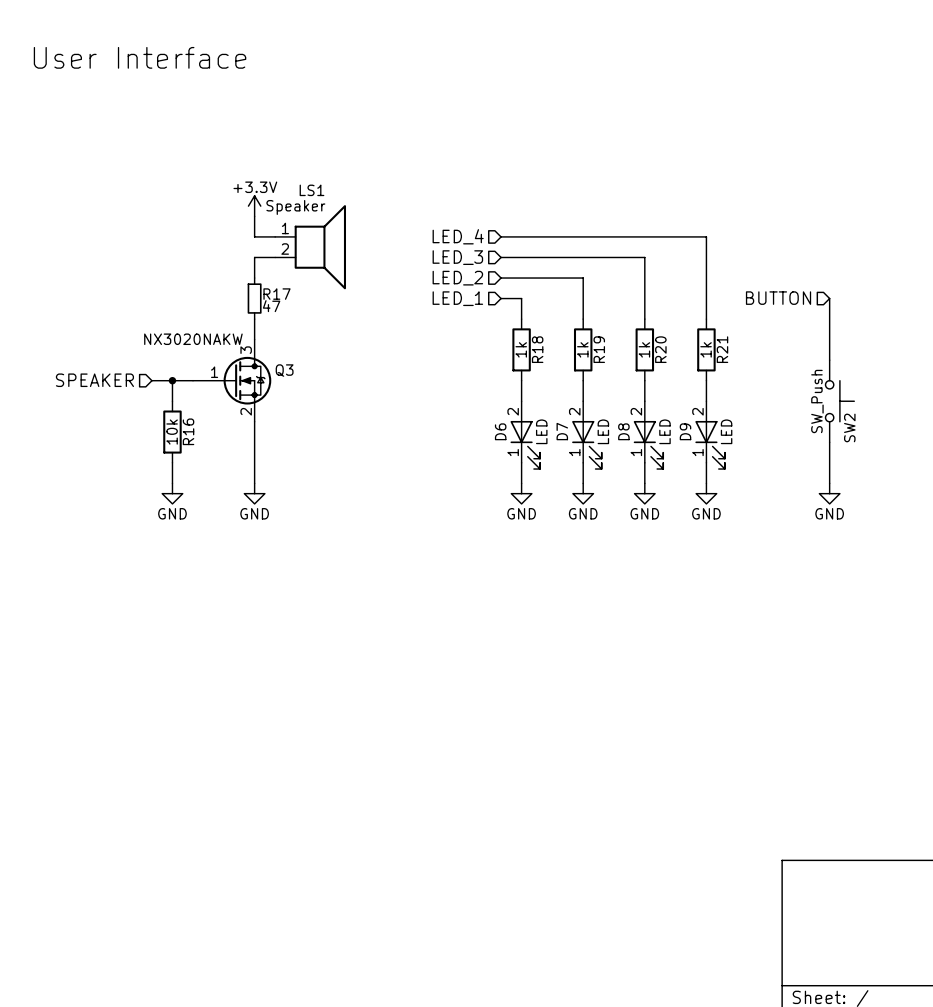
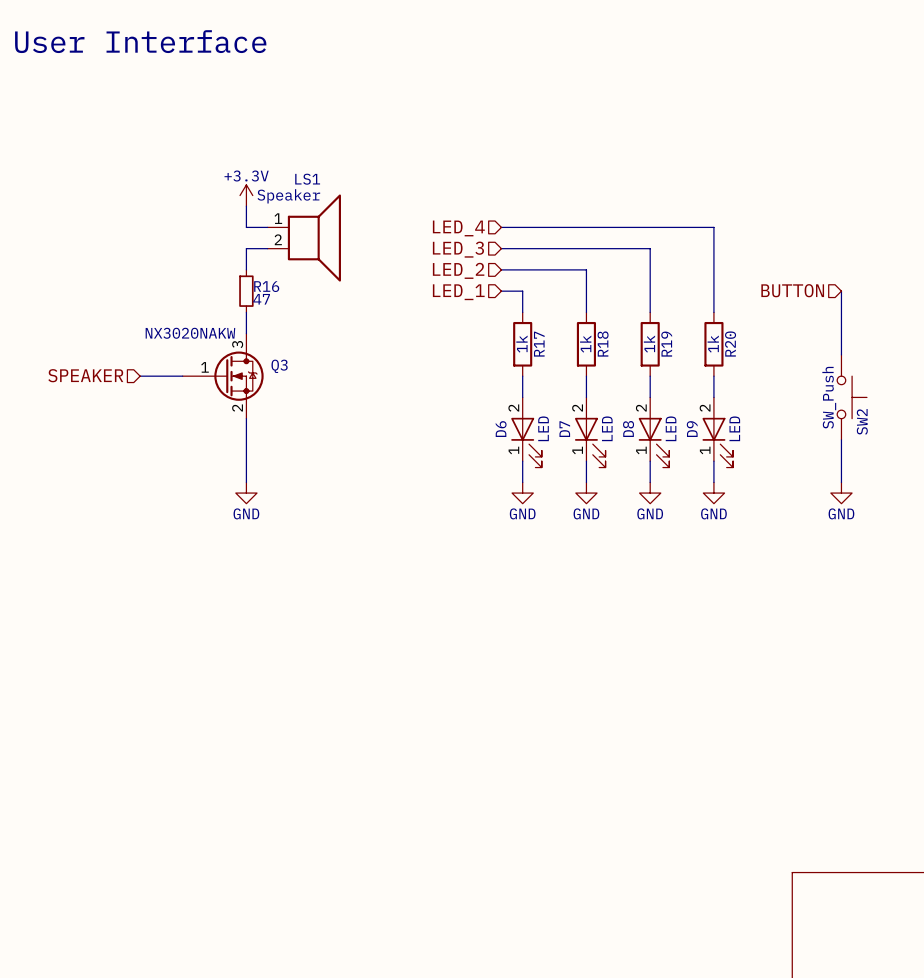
R17 name: R17 (276, 294) -> R16 (266, 286)
R18 name: R18 (537, 349) -> R17 (539, 344)
R19 name: R19 (599, 349) -> R18 (603, 344)
R20 name: R20 (660, 349) -> R19 (666, 344)
R21 name: R21 (722, 349) -> R20 (730, 344)
wire: (172, 380) (172, 401) -> none
junction: (172, 380) -> none
R16: 10k (172, 432) -> none
wire: (172, 462) (172, 483) -> none
power symbol: GND (172, 493) -> none

